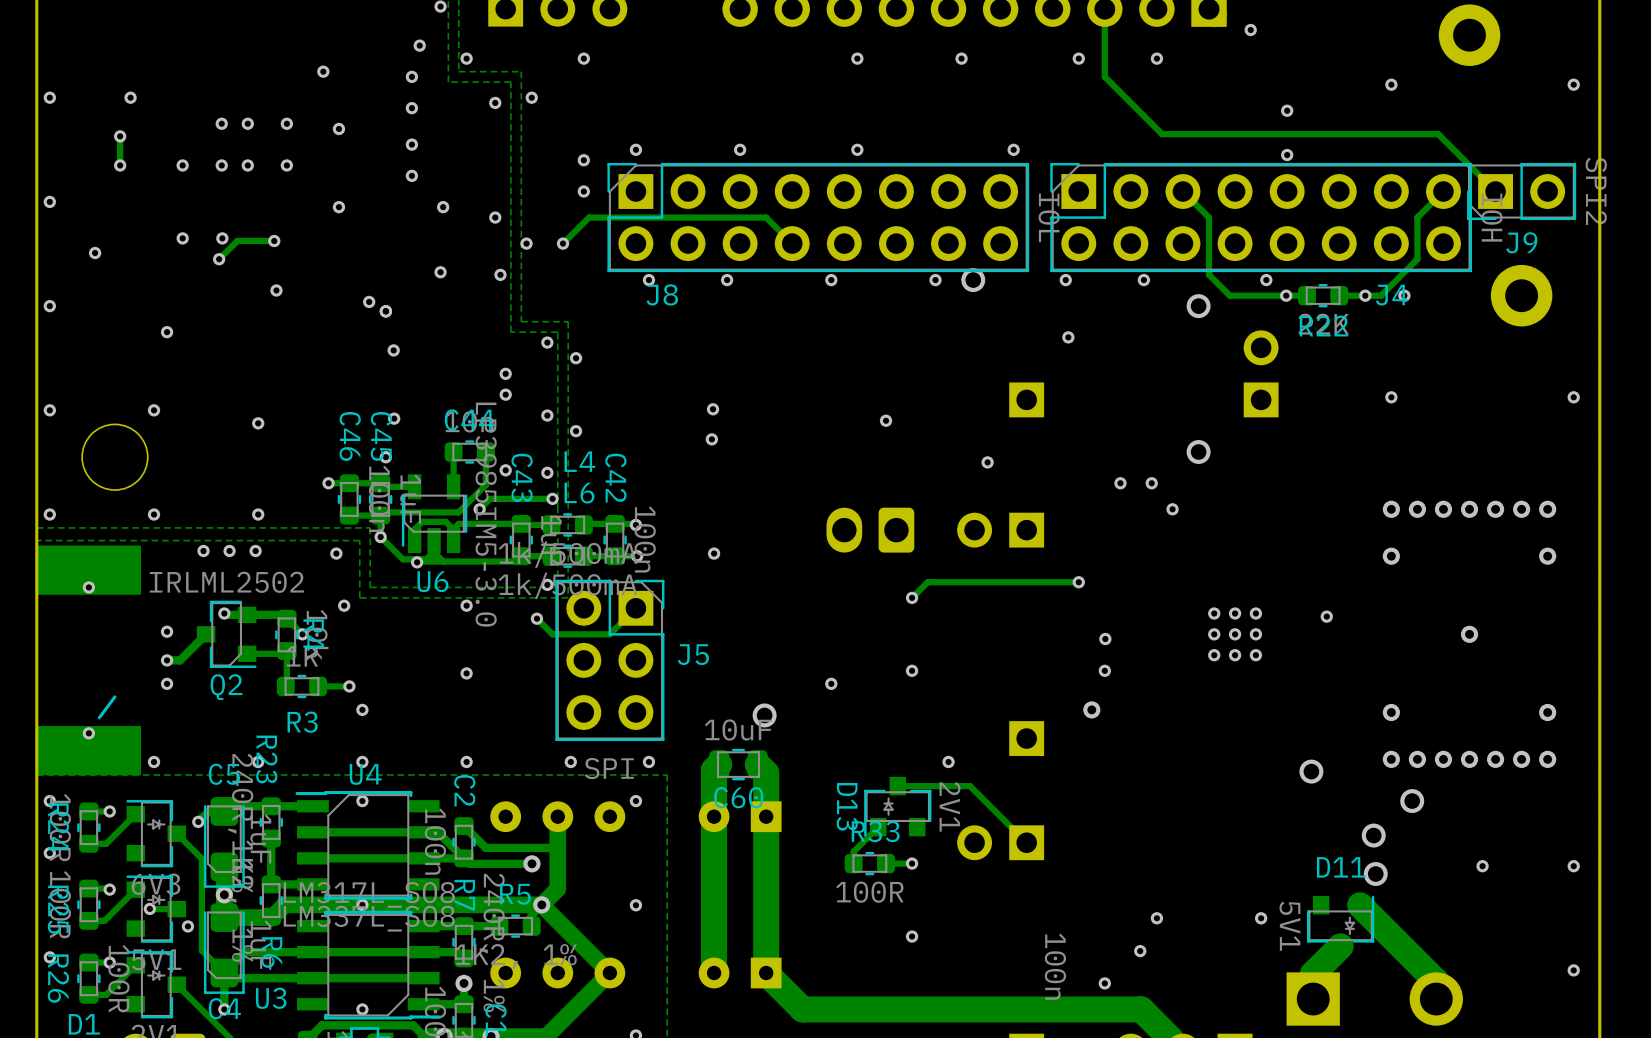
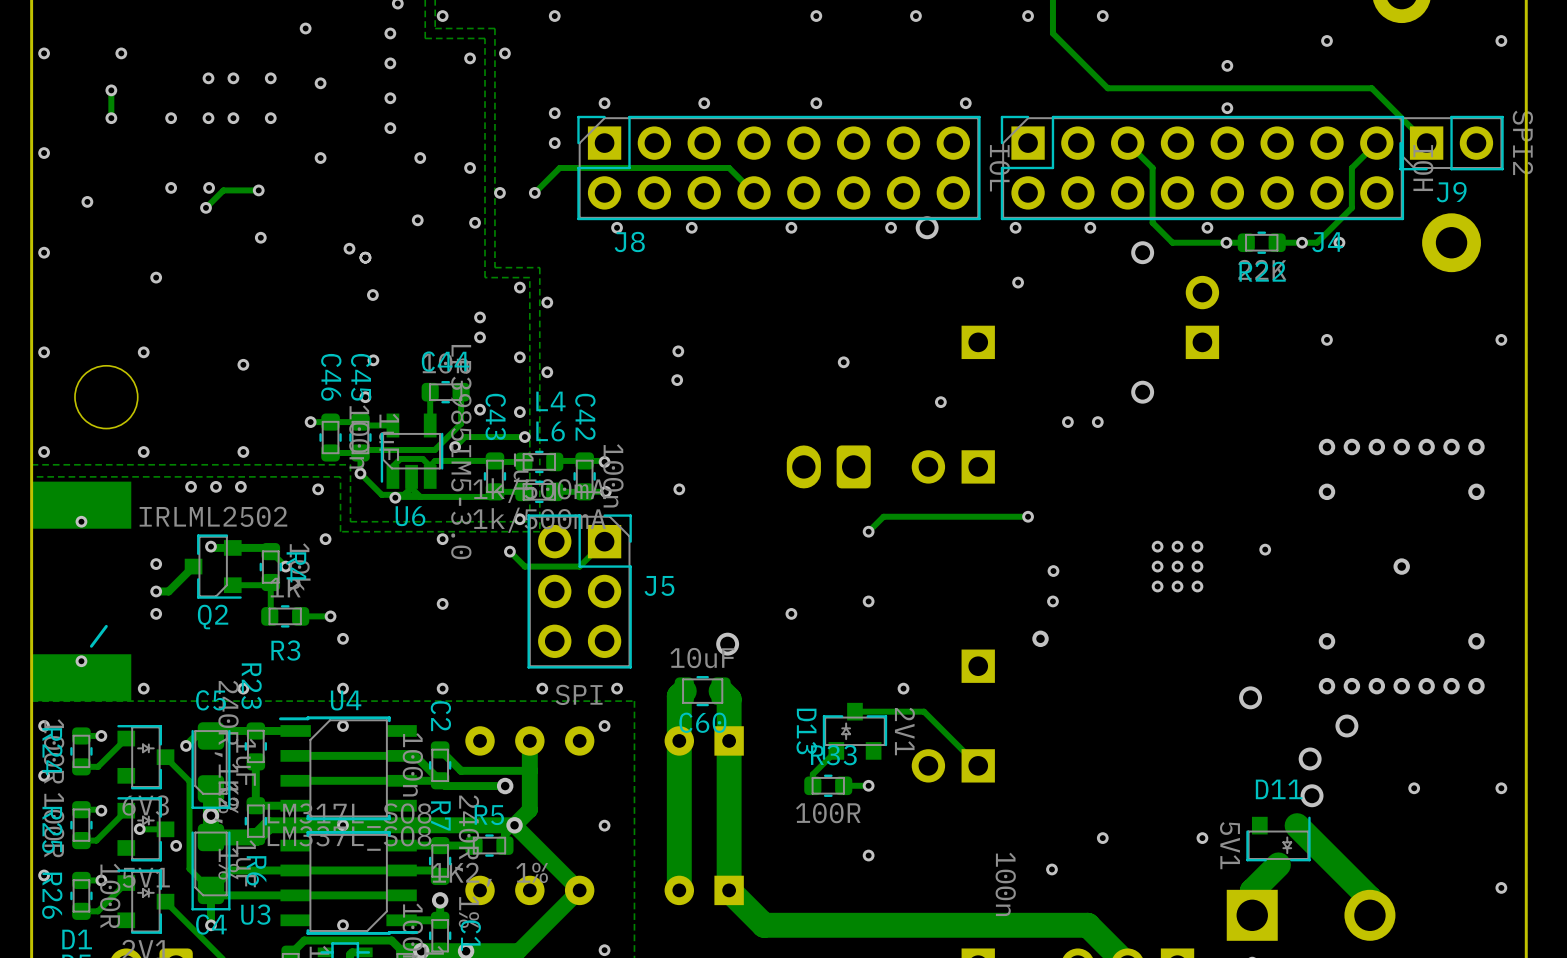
via: (1172, 509) -> none
via: none -> (1051, 869)
via: (1140, 951) -> none
via: (1104, 983) -> none

